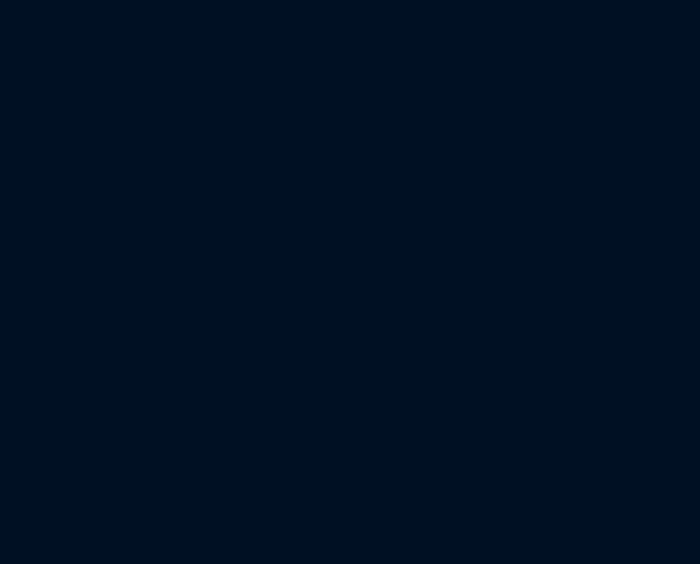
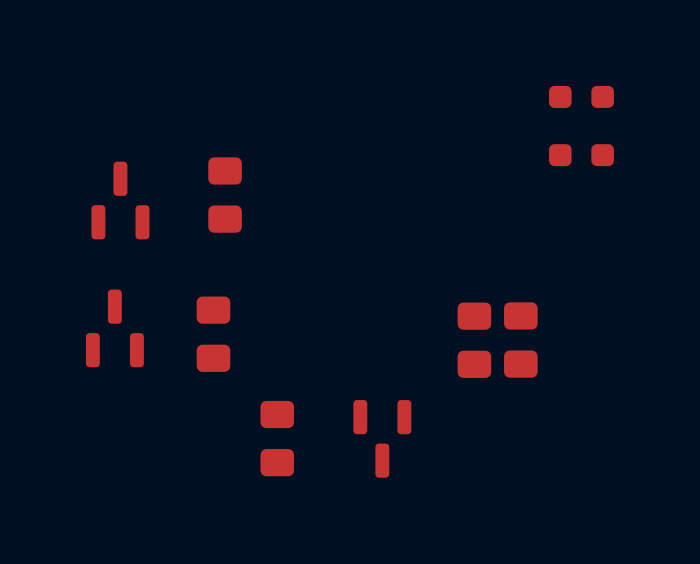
part: none -> (581, 96)
part: none -> (581, 155)
part: none -> (225, 195)
part: none -> (120, 200)
part: none -> (114, 328)
part: none -> (213, 334)
part: none -> (474, 340)
part: none -> (520, 340)
part: none -> (277, 438)
part: none -> (382, 438)

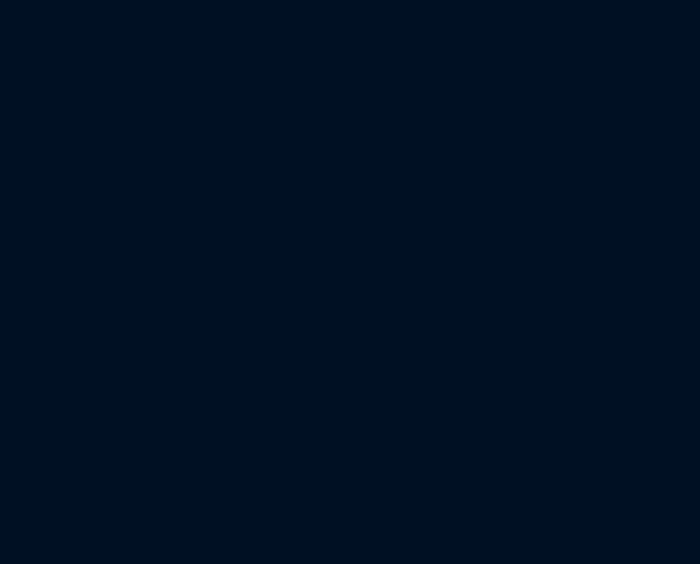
part: (581, 96) -> none
part: (581, 155) -> none
part: (225, 195) -> none
part: (120, 200) -> none
part: (114, 328) -> none
part: (213, 334) -> none
part: (474, 340) -> none
part: (520, 340) -> none
part: (277, 438) -> none
part: (382, 438) -> none

